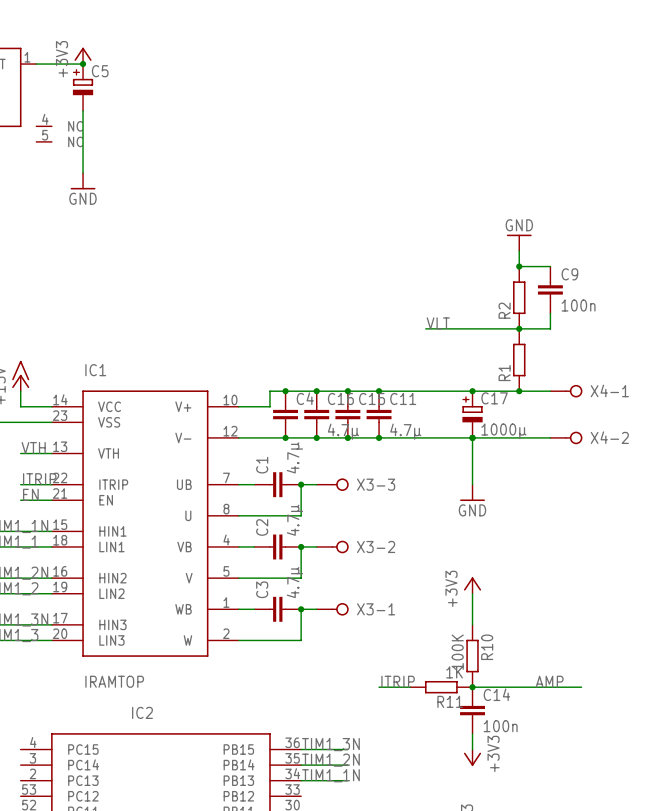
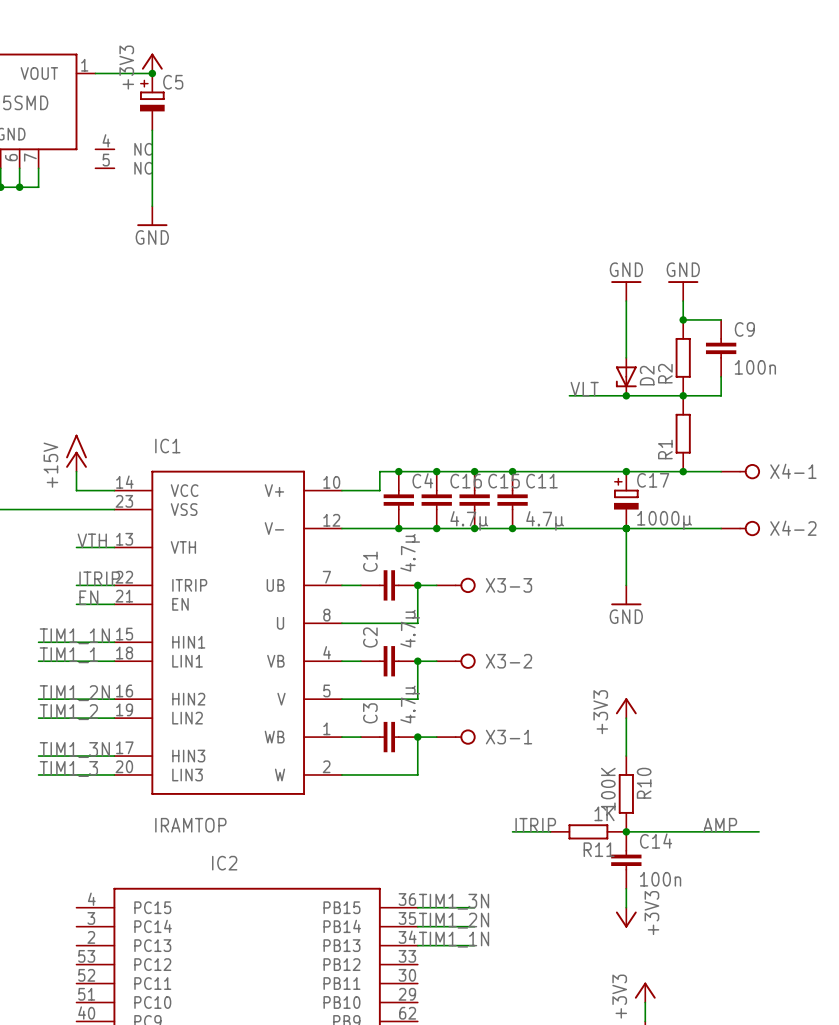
power symbol: none -> GND (626, 291)
wire: none -> (626, 301) (626, 357)
D2: none -> (626, 376)
junction: none -> (626, 395)

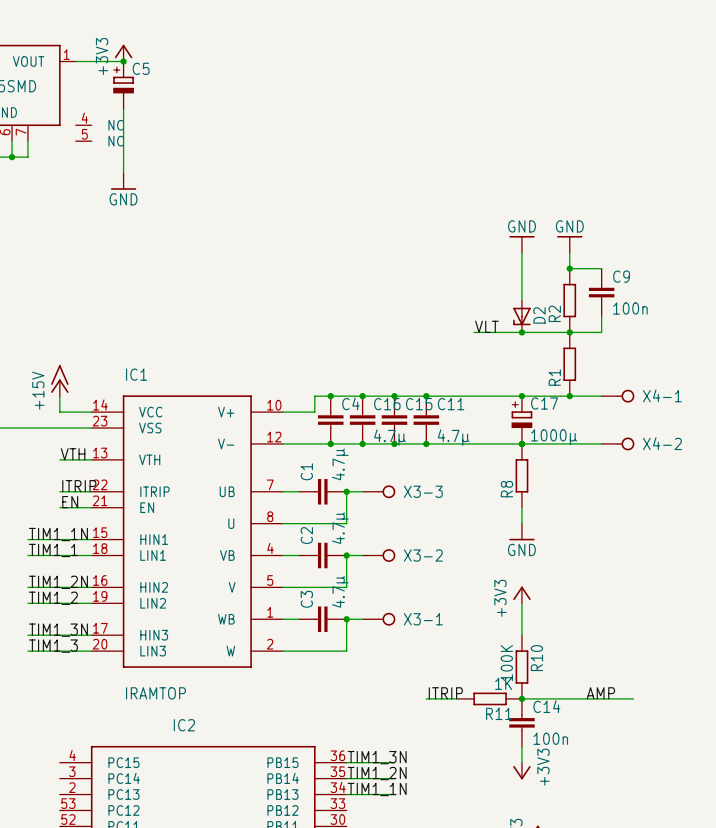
wire: (626, 528) (626, 585) -> none
R8: none -> (521, 475)
power symbol position: GND (626, 595) -> GND (521, 532)
wire: none -> (521, 507) (521, 523)

